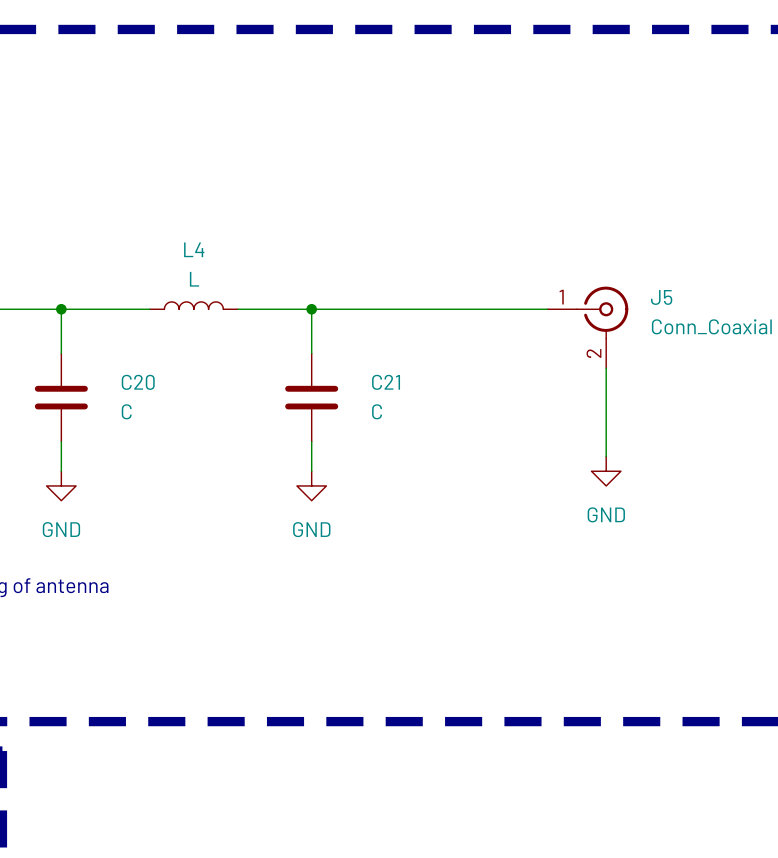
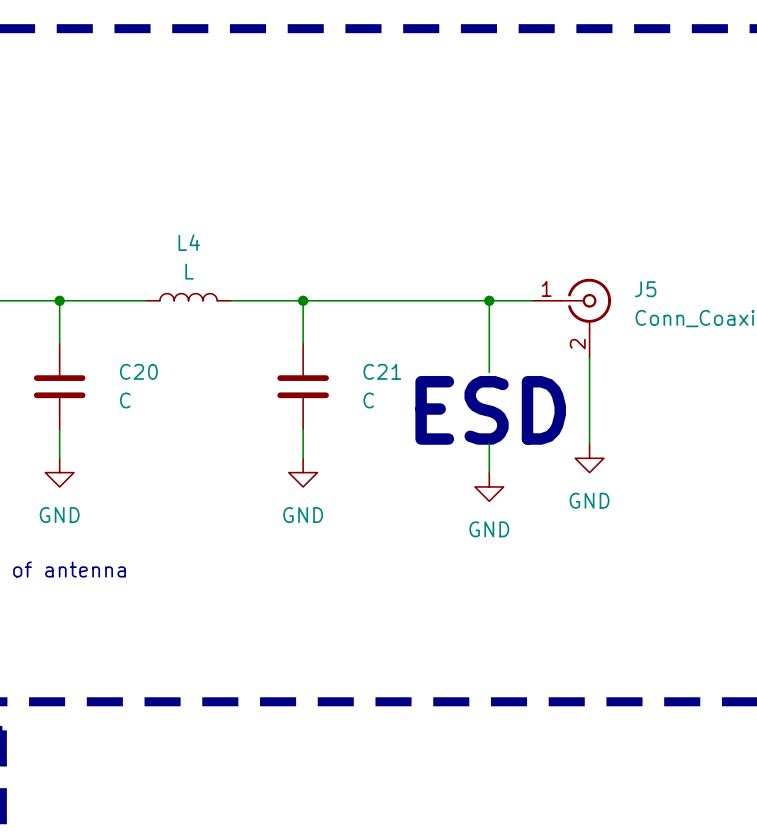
wire: none -> (489, 300) (489, 372)
junction: none -> (489, 300)
text: none -> ESD (490, 410)
wire: none -> (489, 443) (489, 472)
power symbol: none -> GND (489, 486)

